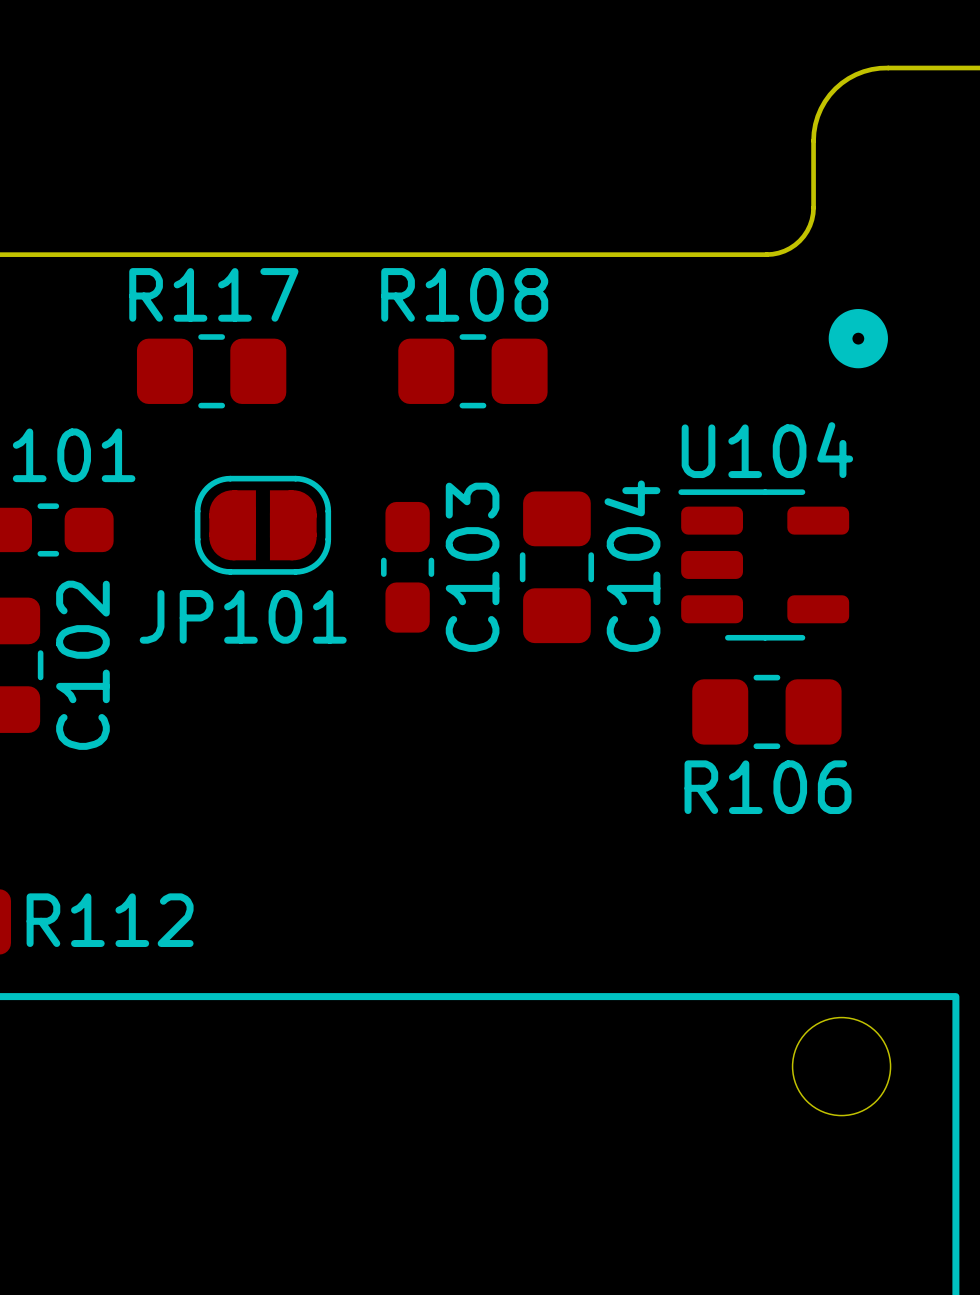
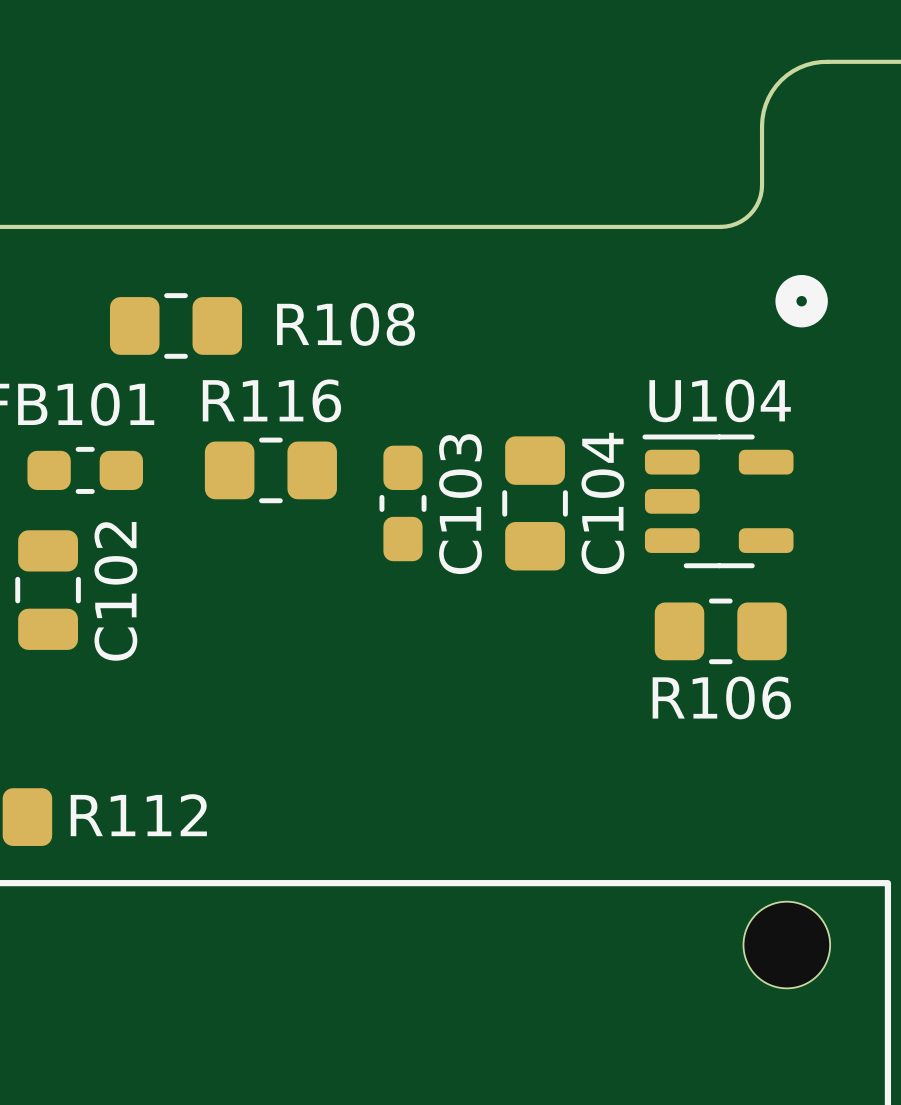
R108 name position: R108 (464, 294) -> R108 (346, 324)
R117: (211, 371) -> none
R108 position: (472, 371) -> (176, 325)
JP101: (262, 525) -> none
R116: none -> (270, 470)

